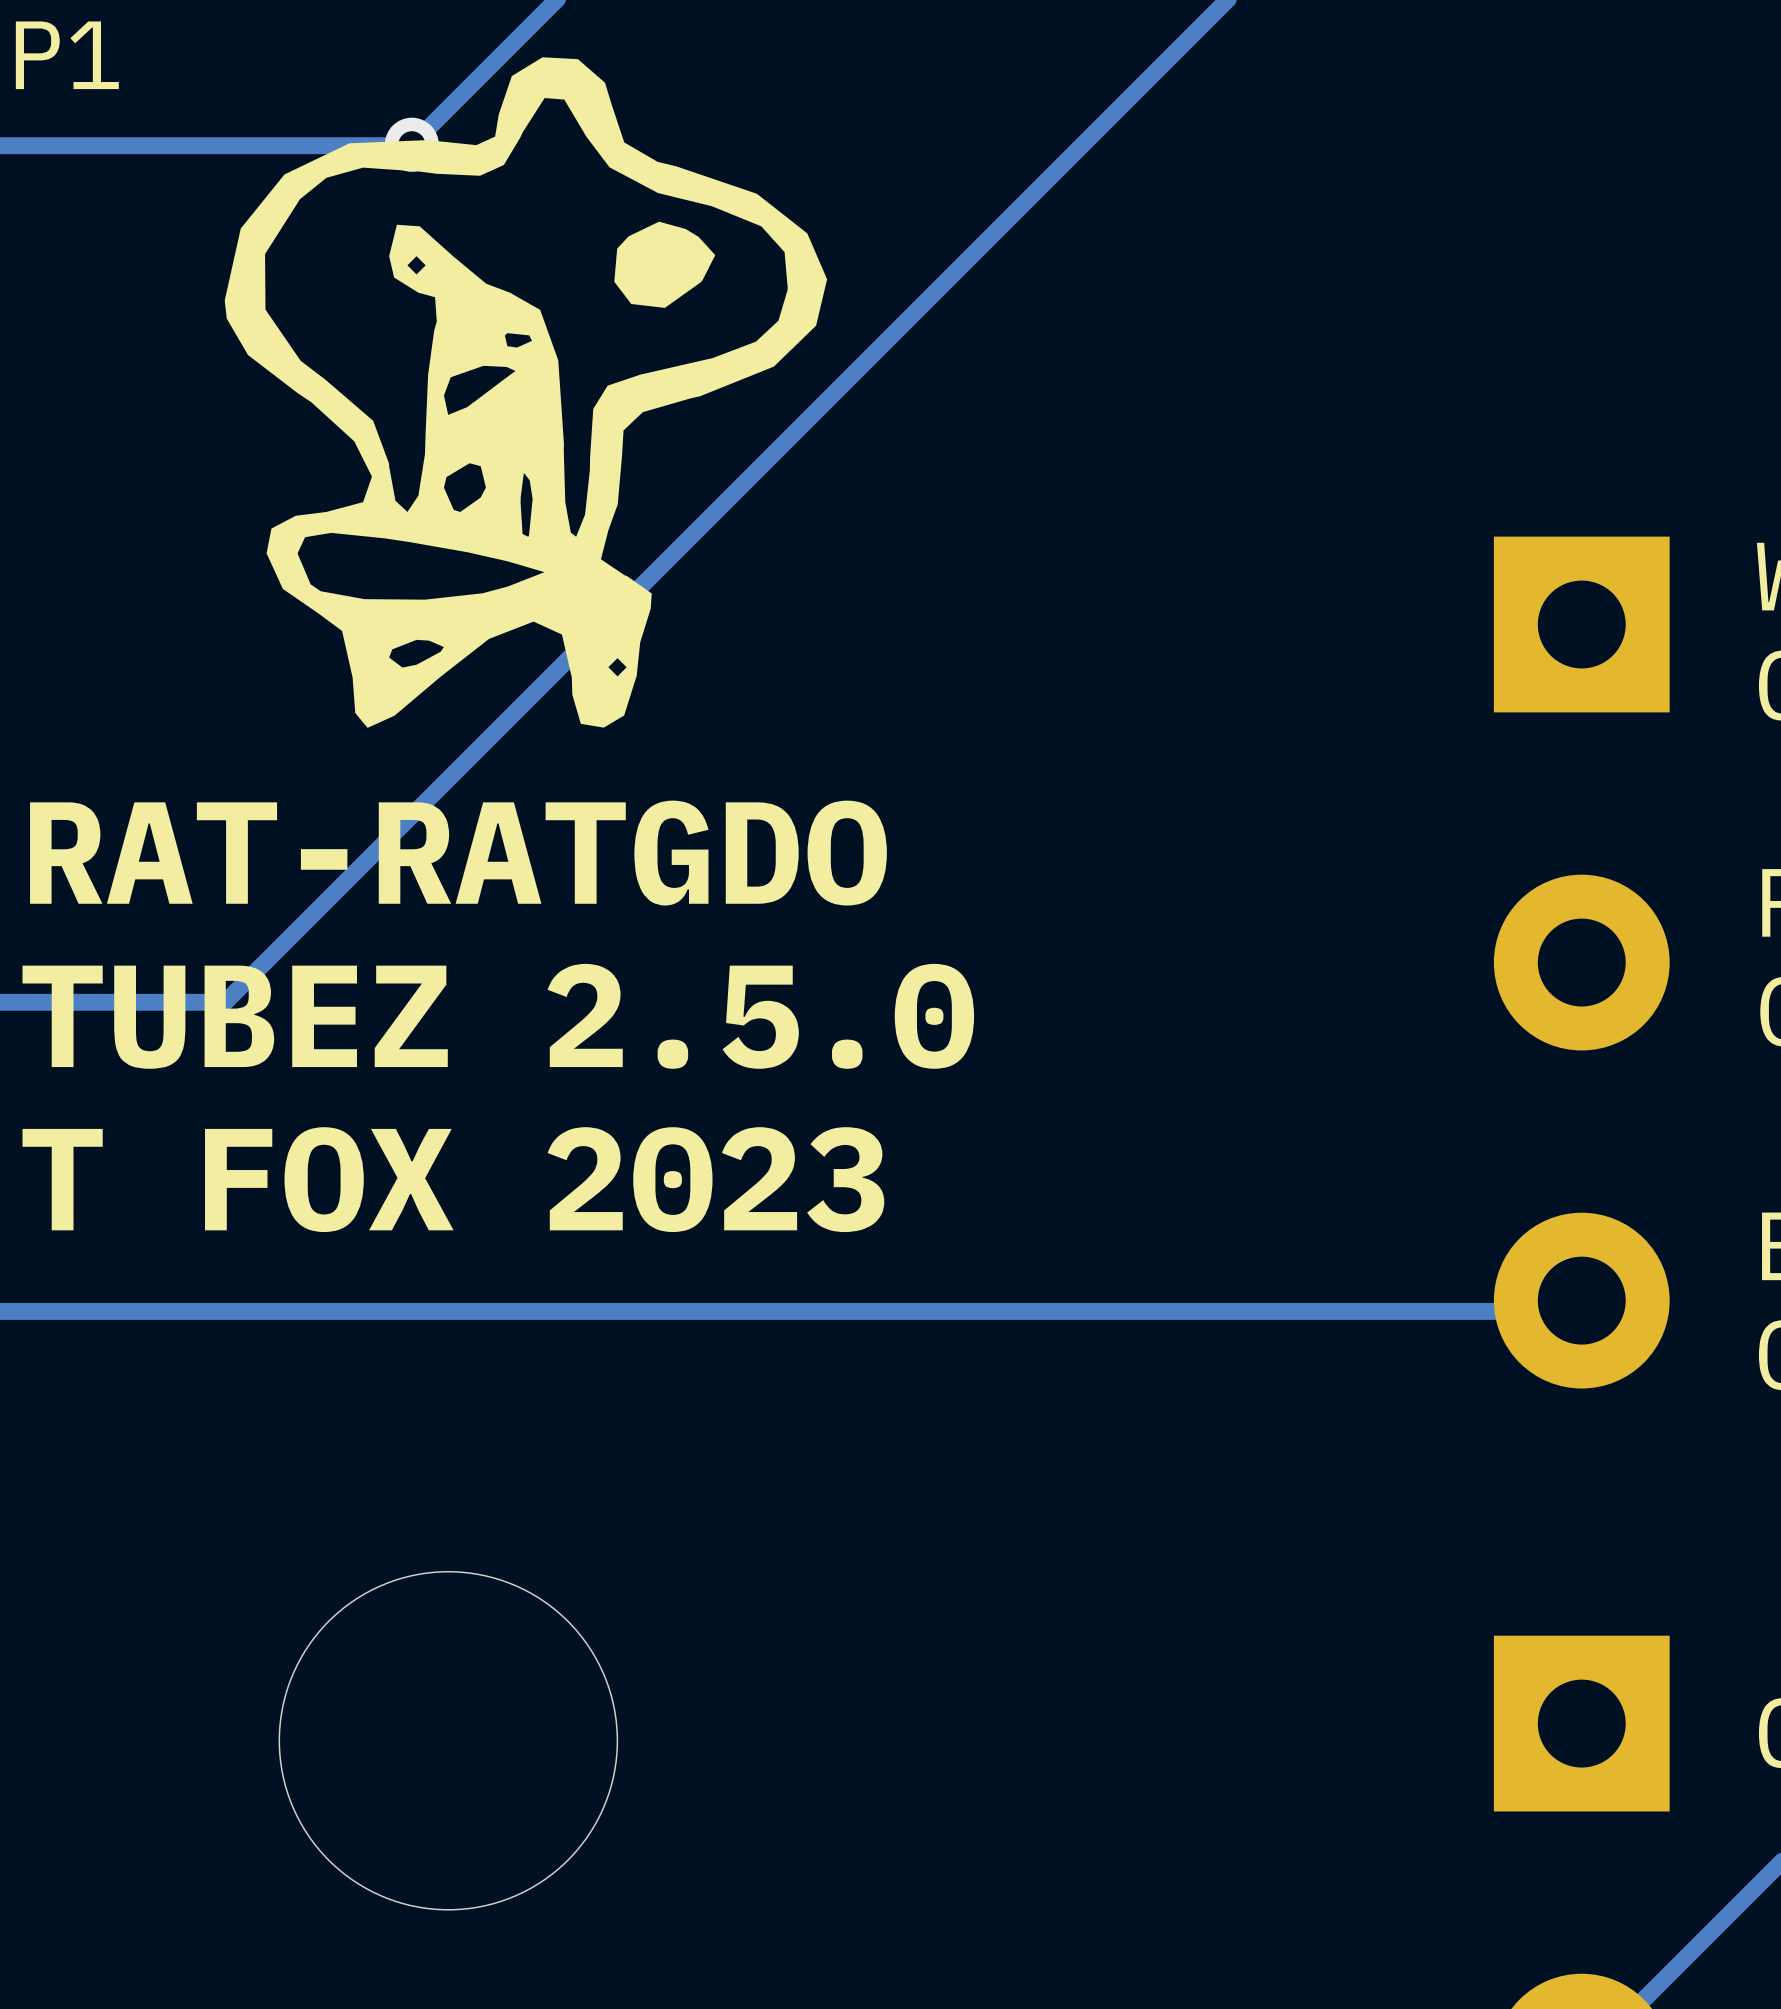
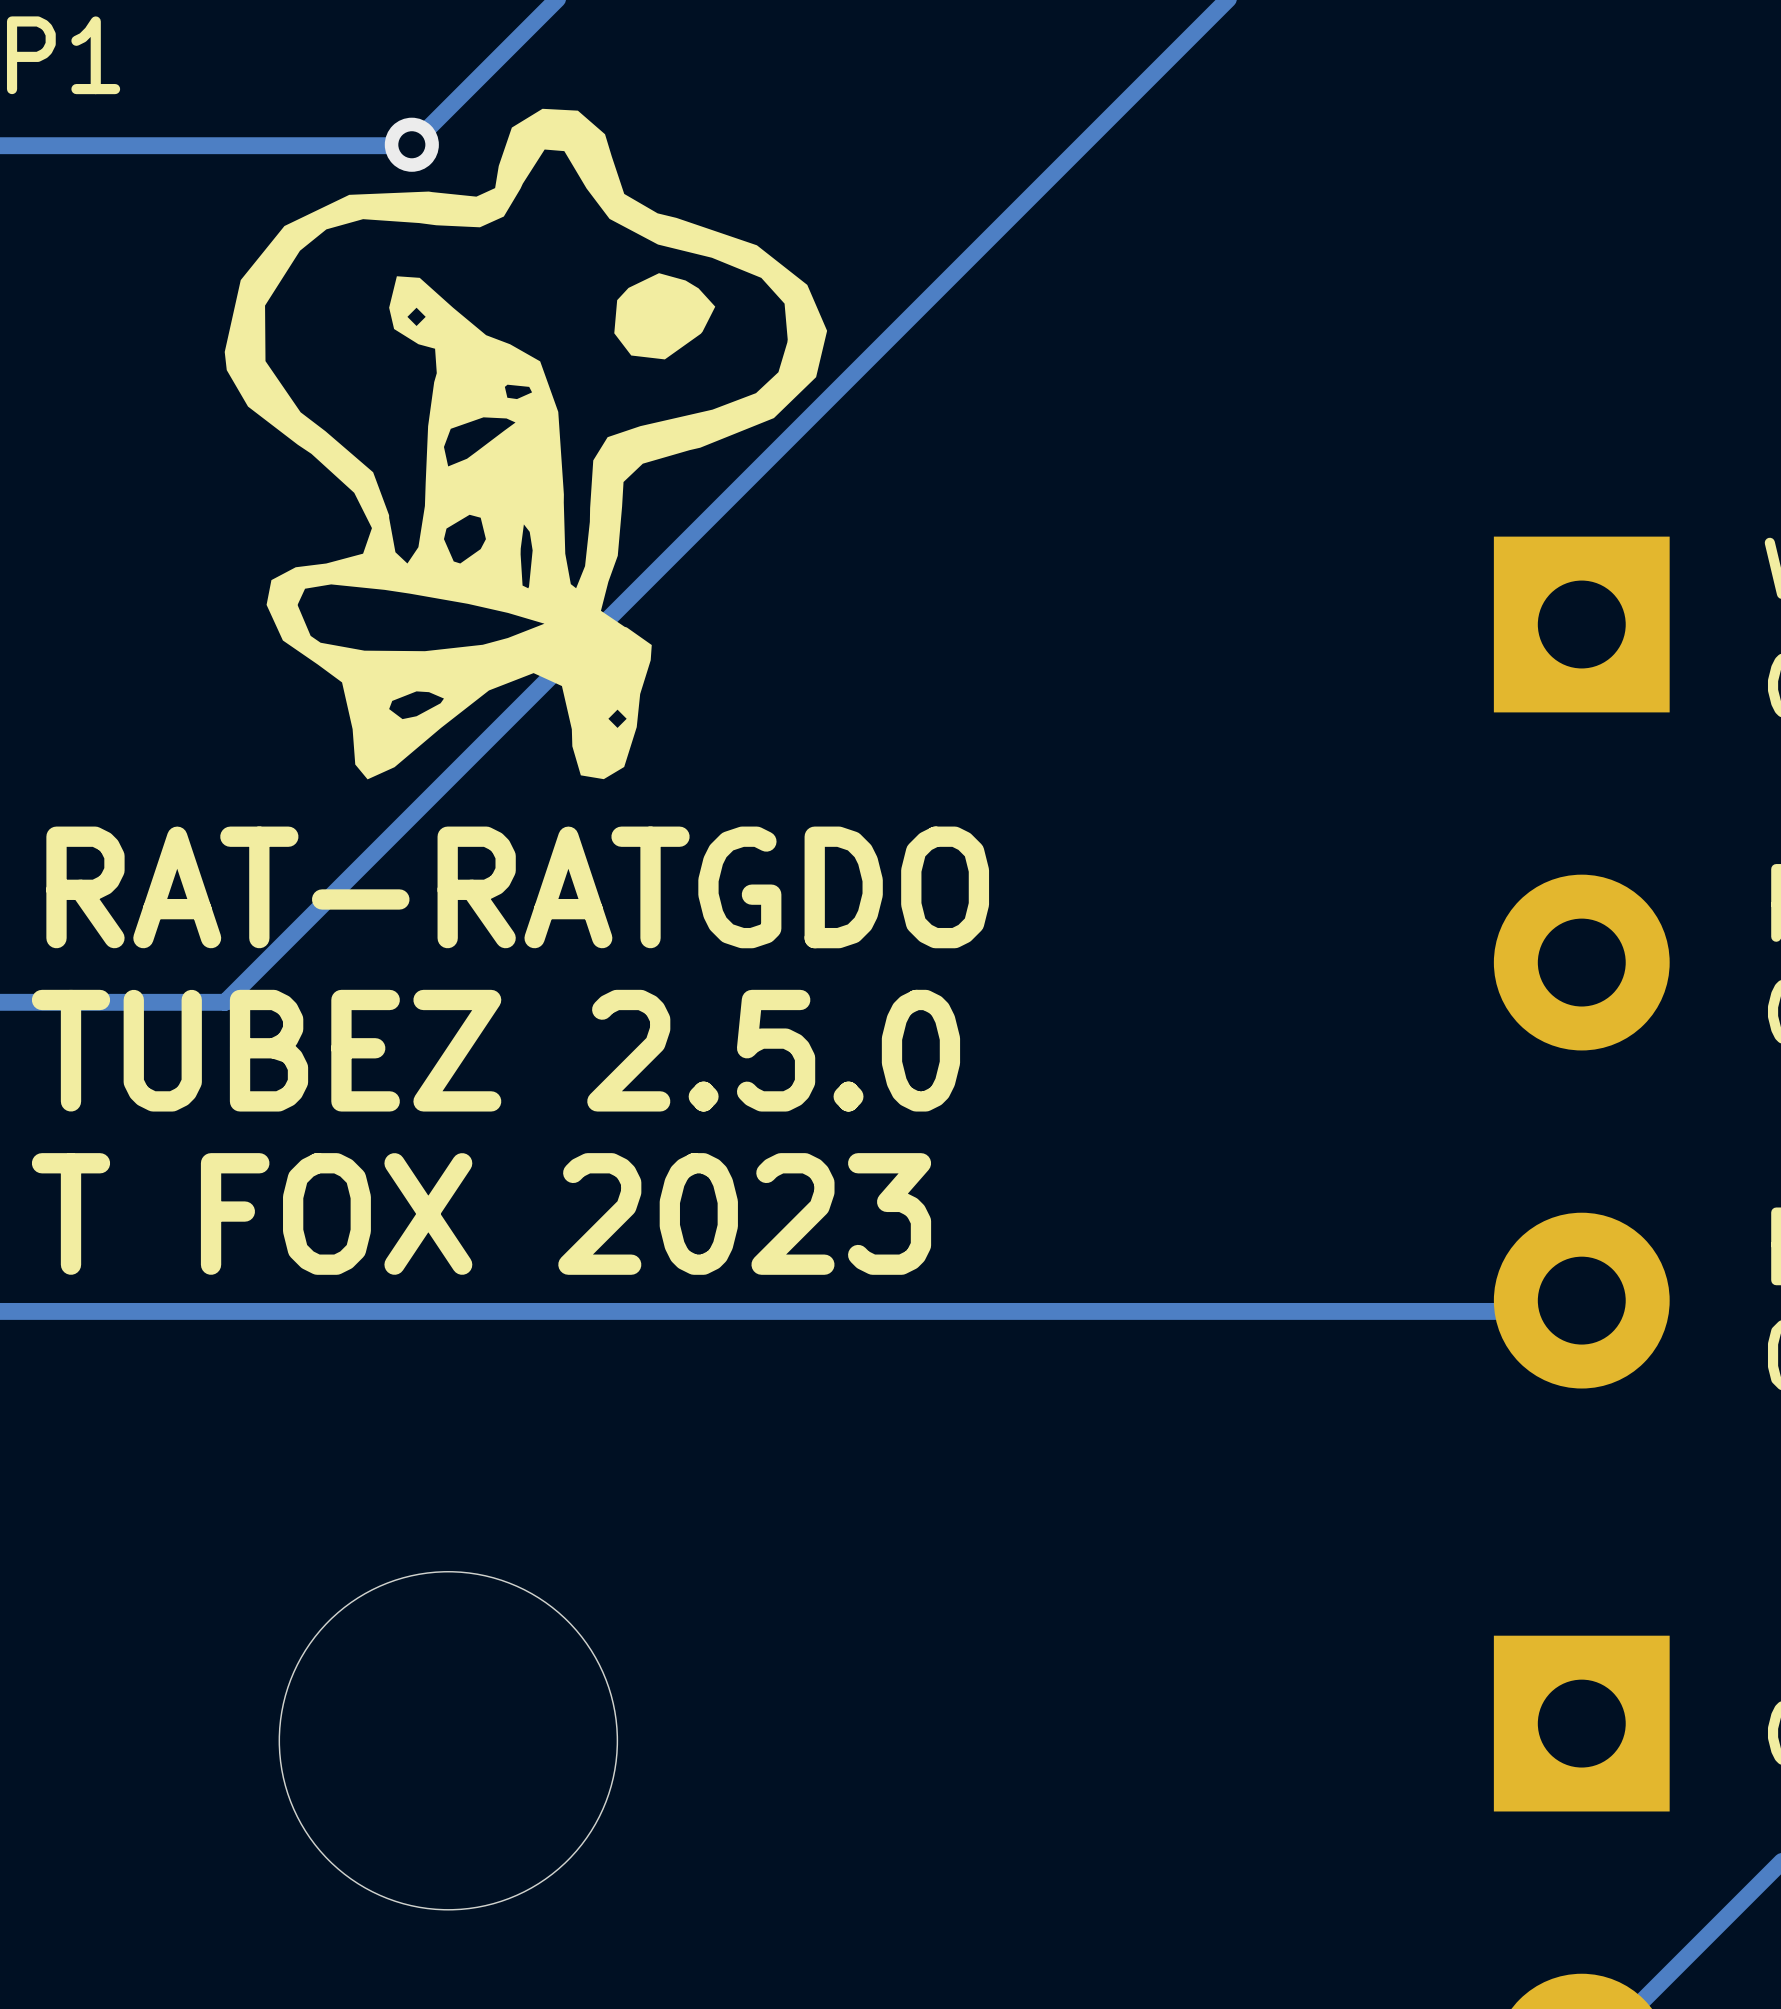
drawing position: (525, 392) -> (525, 444)
text position: RAT-RATGDO (458, 853) -> RAT-RATGDO (517, 887)
text position: TUBEZ 2.5.0 (498, 1016) -> TUBEZ 2.5.0 (495, 1050)
text position: T FOX 2023 (453, 1179) -> T FOX 2023 (481, 1213)

